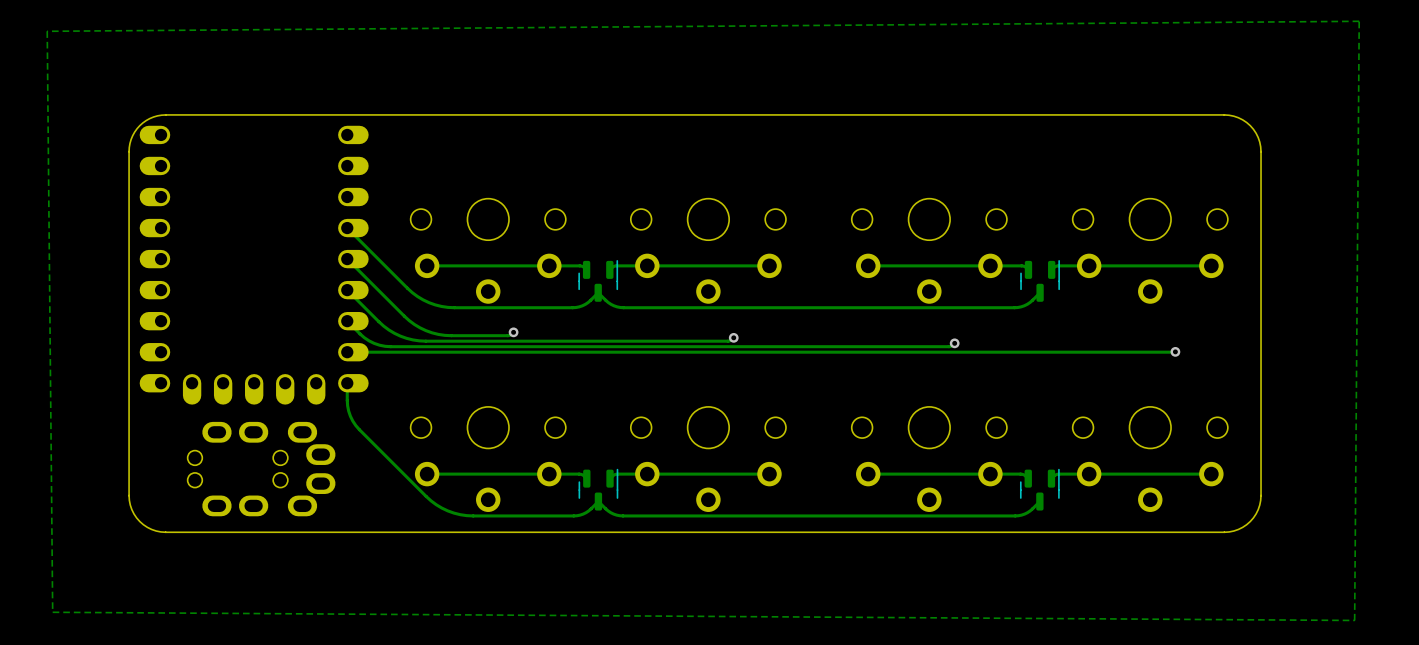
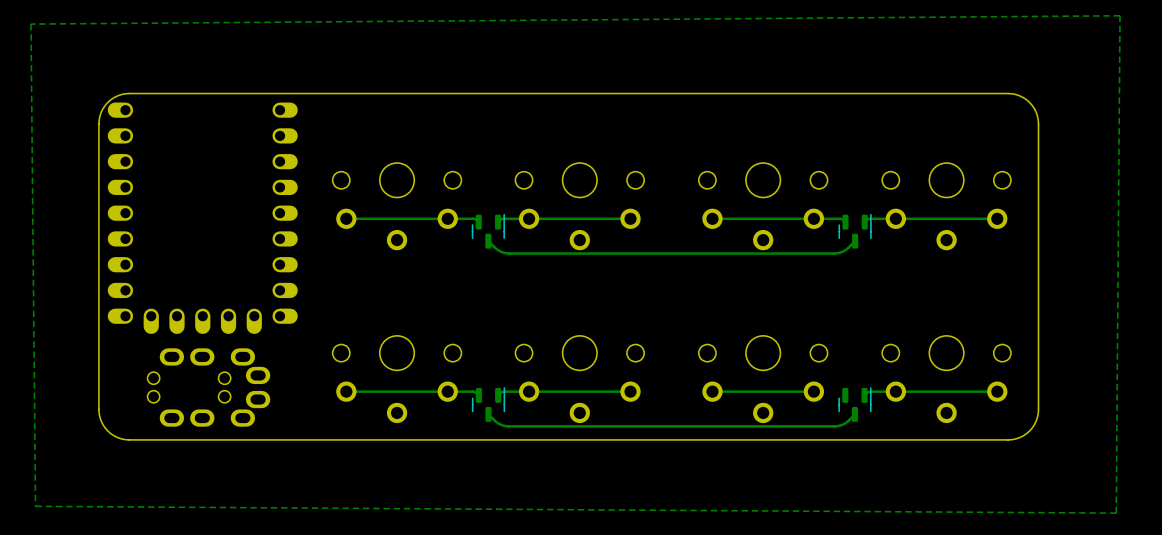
track: (347, 228) (412, 292) (435, 304) (454, 307) (576, 307) (585, 304) (598, 292) -> none
track: (347, 259) (404, 316) (425, 330) (451, 335) (507, 335) (513, 332) -> none
track: (347, 290) (388, 329) (406, 338) (419, 340) (728, 341) (733, 337) -> none
track: (347, 321) (369, 340) (390, 346) (948, 346) (954, 343) -> none
via: (513, 332) -> none
via: (733, 337) -> none
via: (954, 343) -> none
via: (1175, 351) -> none
track: (1175, 352) (347, 352) -> none
track: (347, 383) (348, 411) (355, 425) (426, 496) (447, 510) (473, 515) (573, 515) (586, 512) (598, 501) -> none
track: (990, 474) (1021, 474) (1028, 478) -> none

